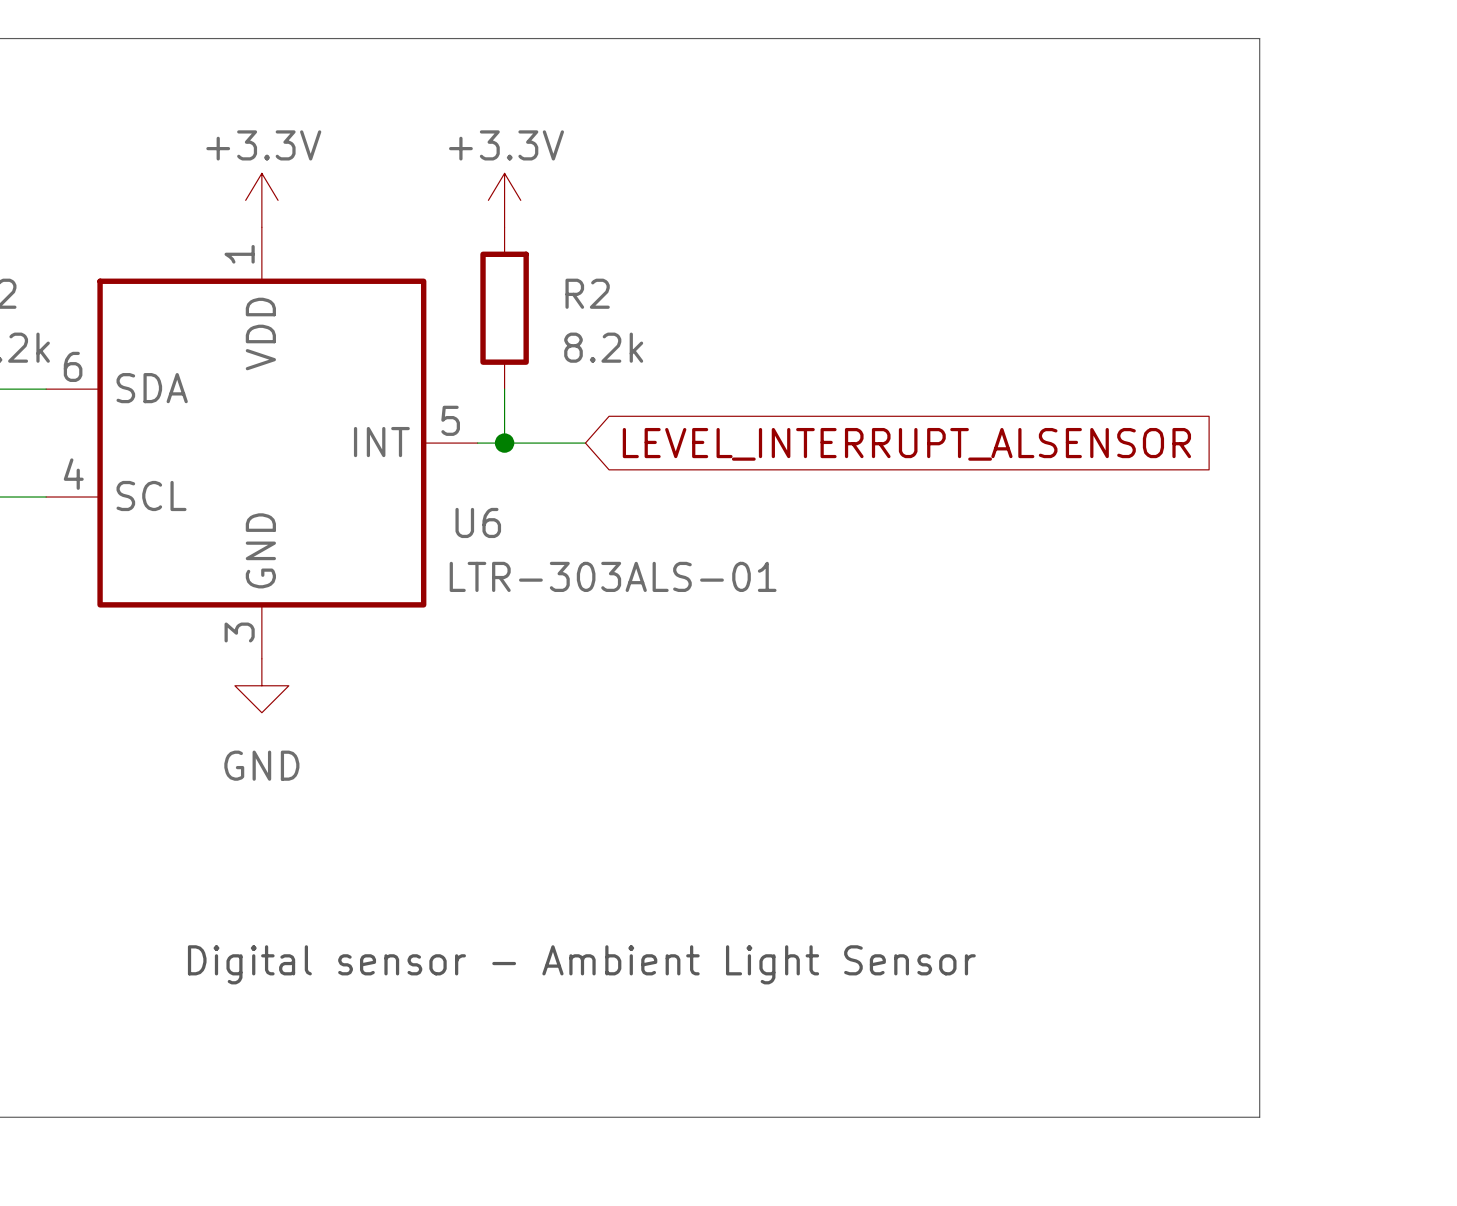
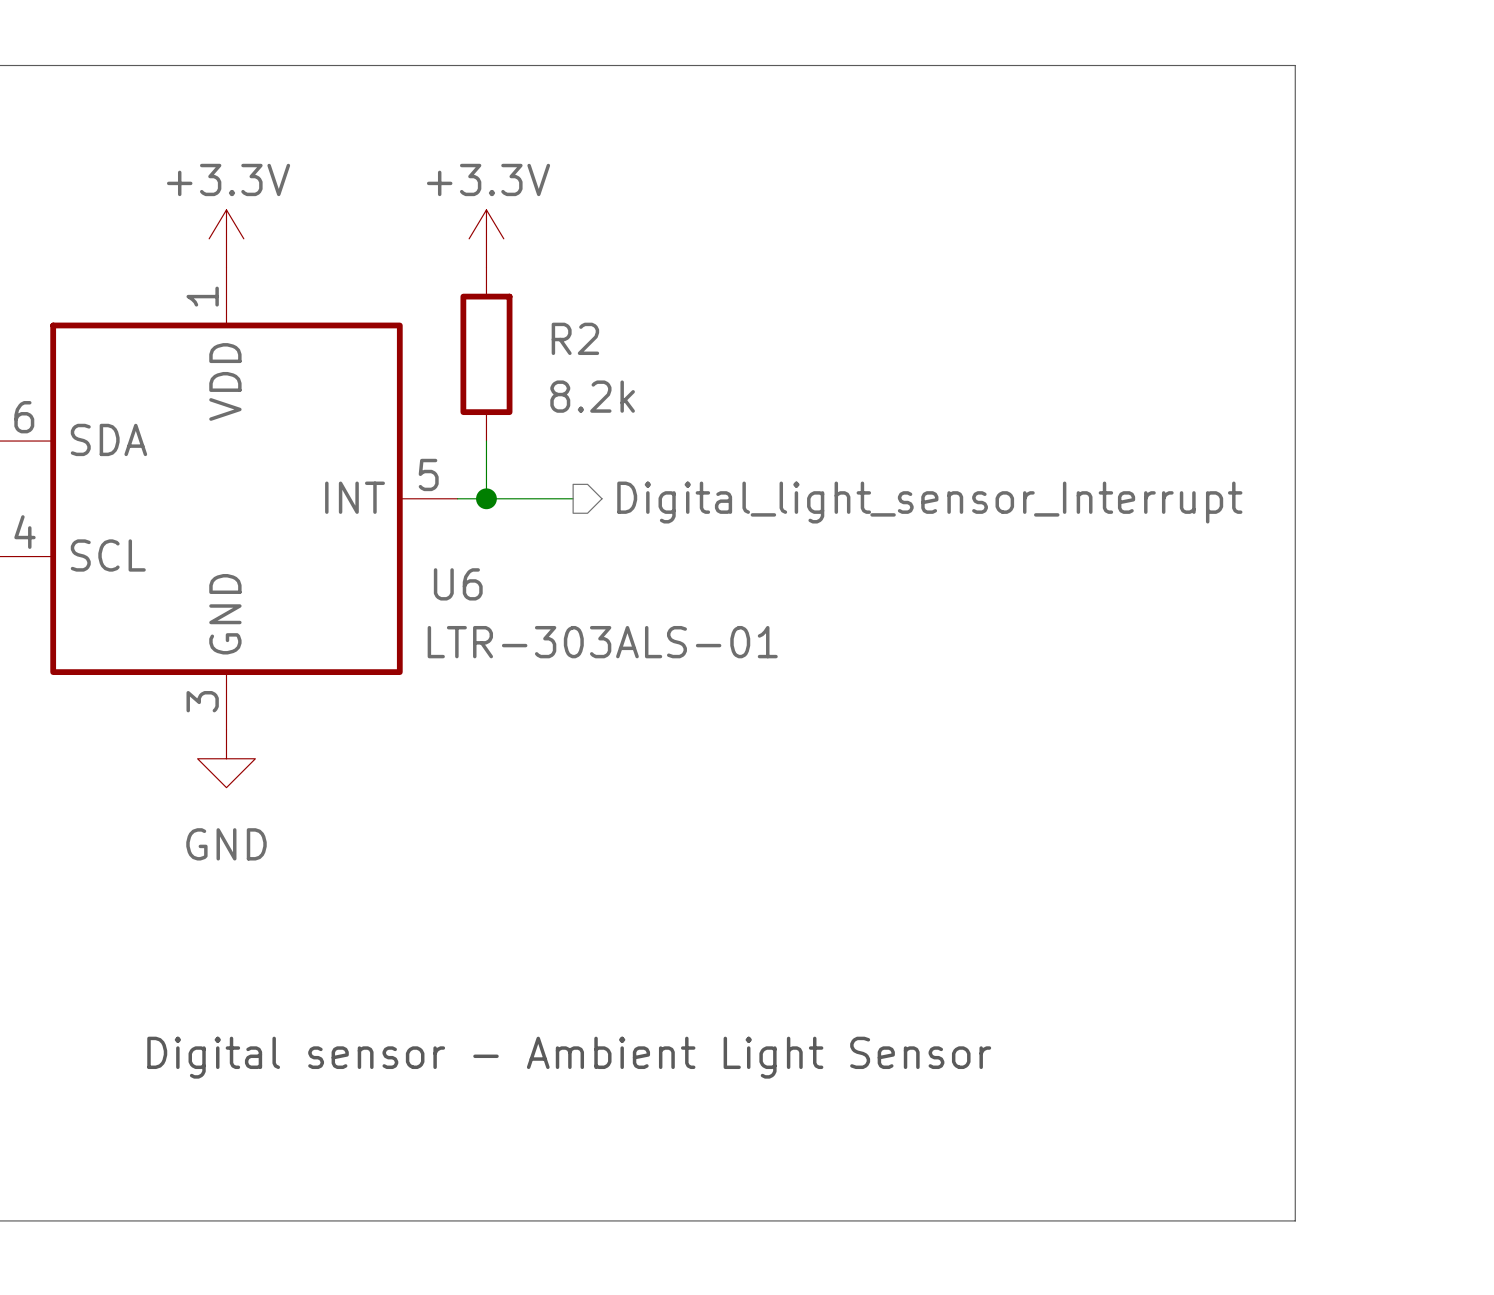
global label: LEVEL_INTERRUPT_ALSENSOR (906, 444) -> none
hierarchical label: none -> Digital_light_sensor_Interrupt (929, 502)

